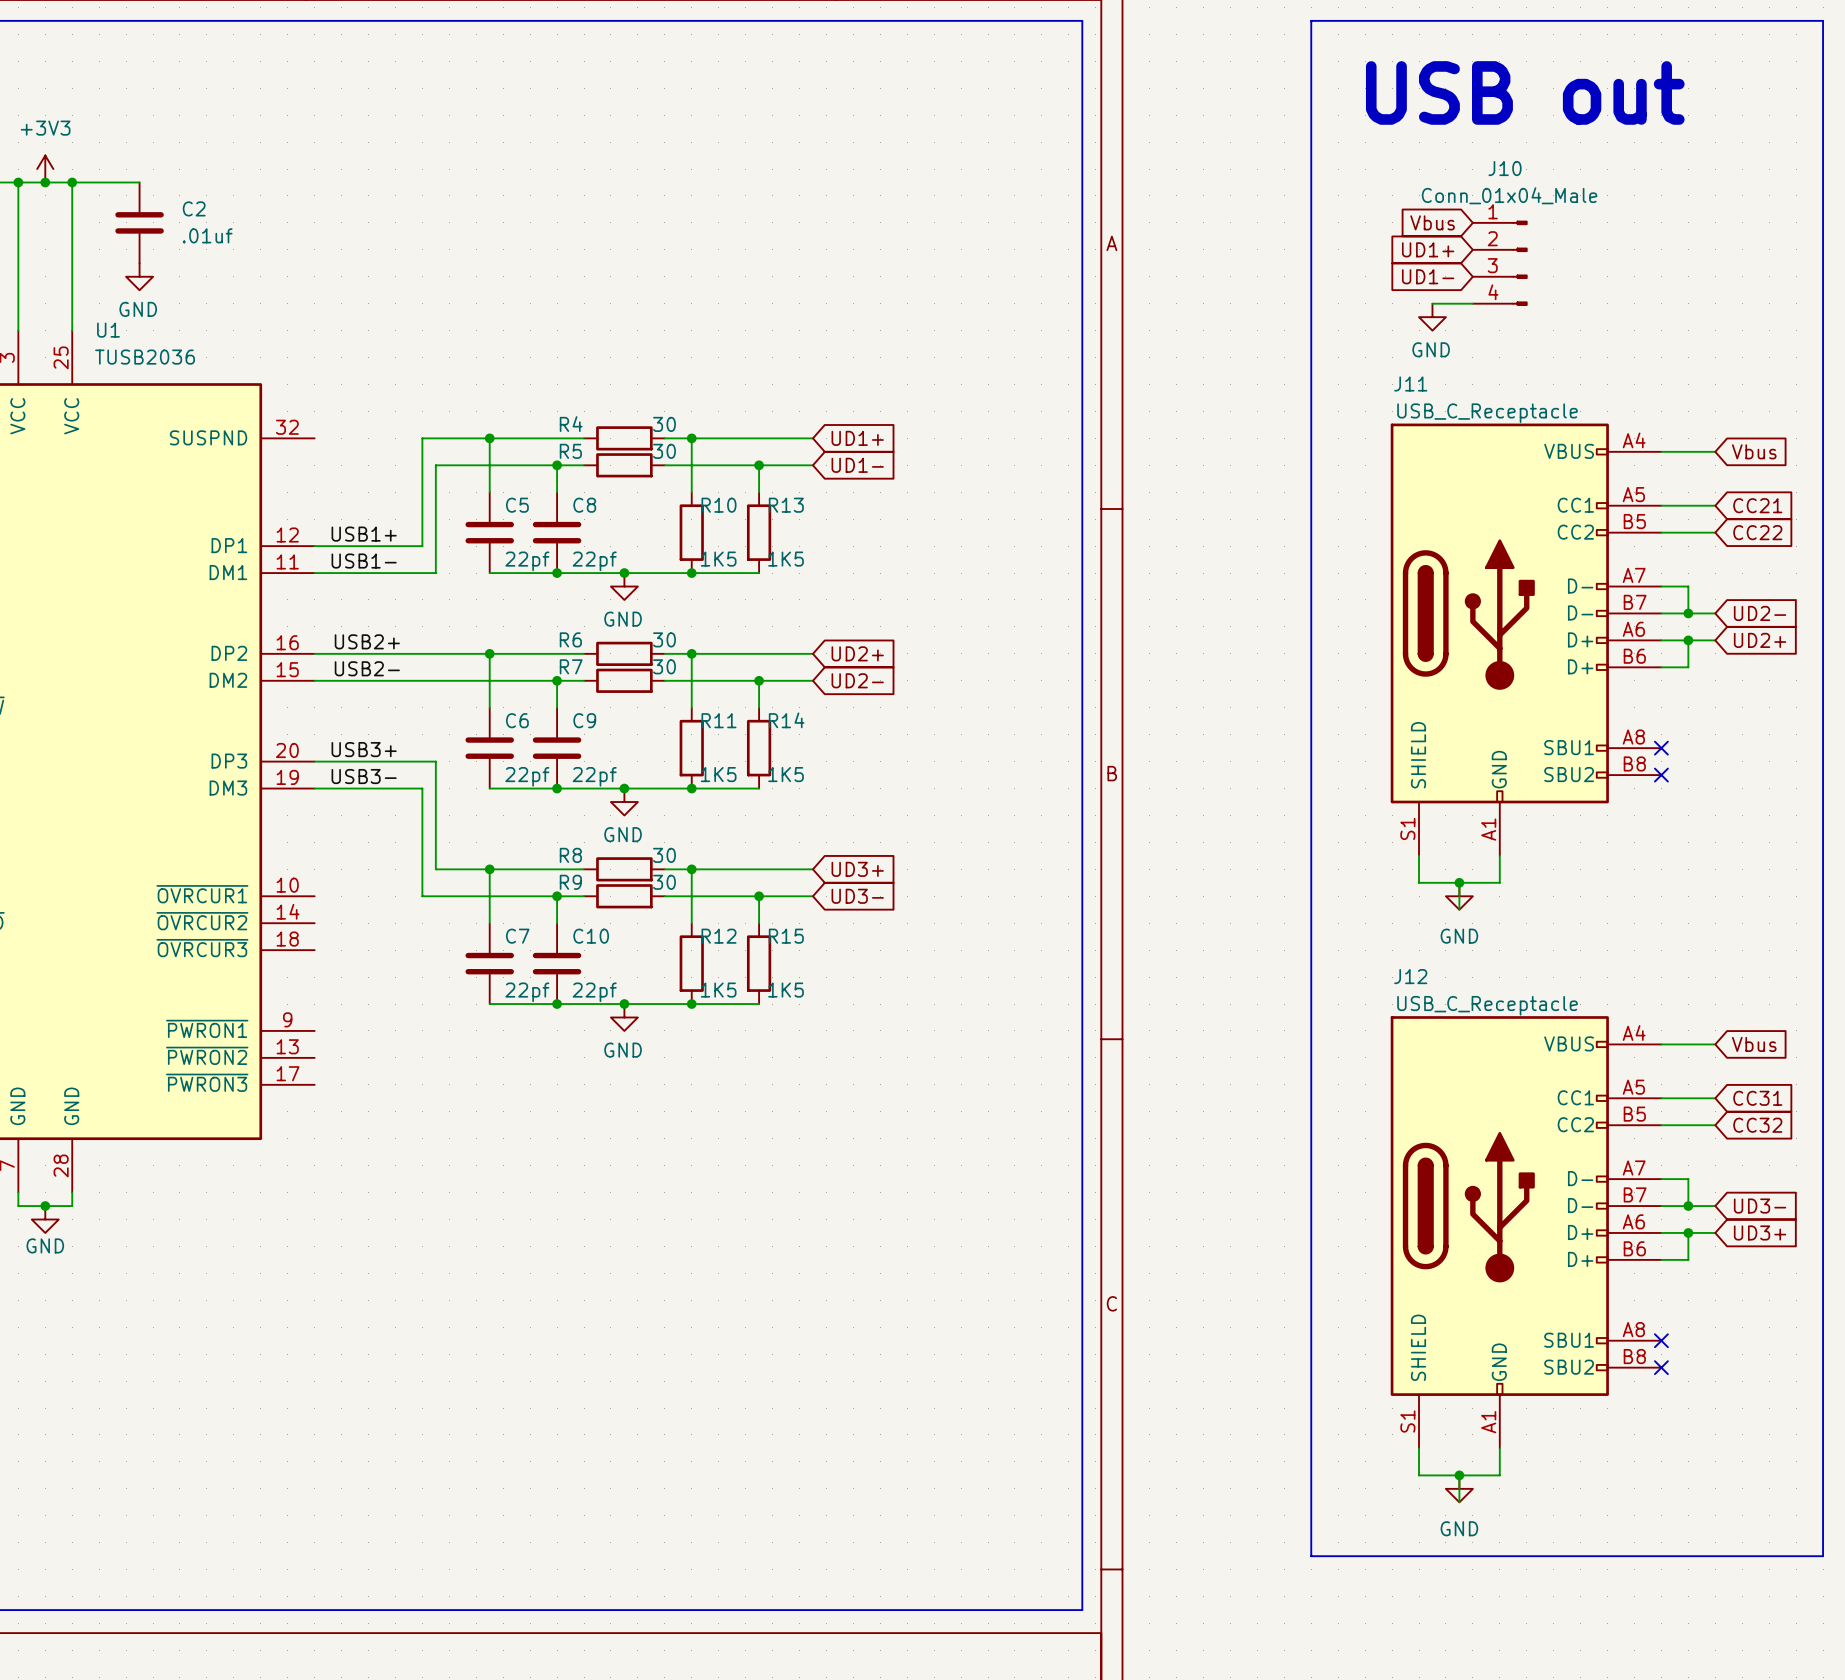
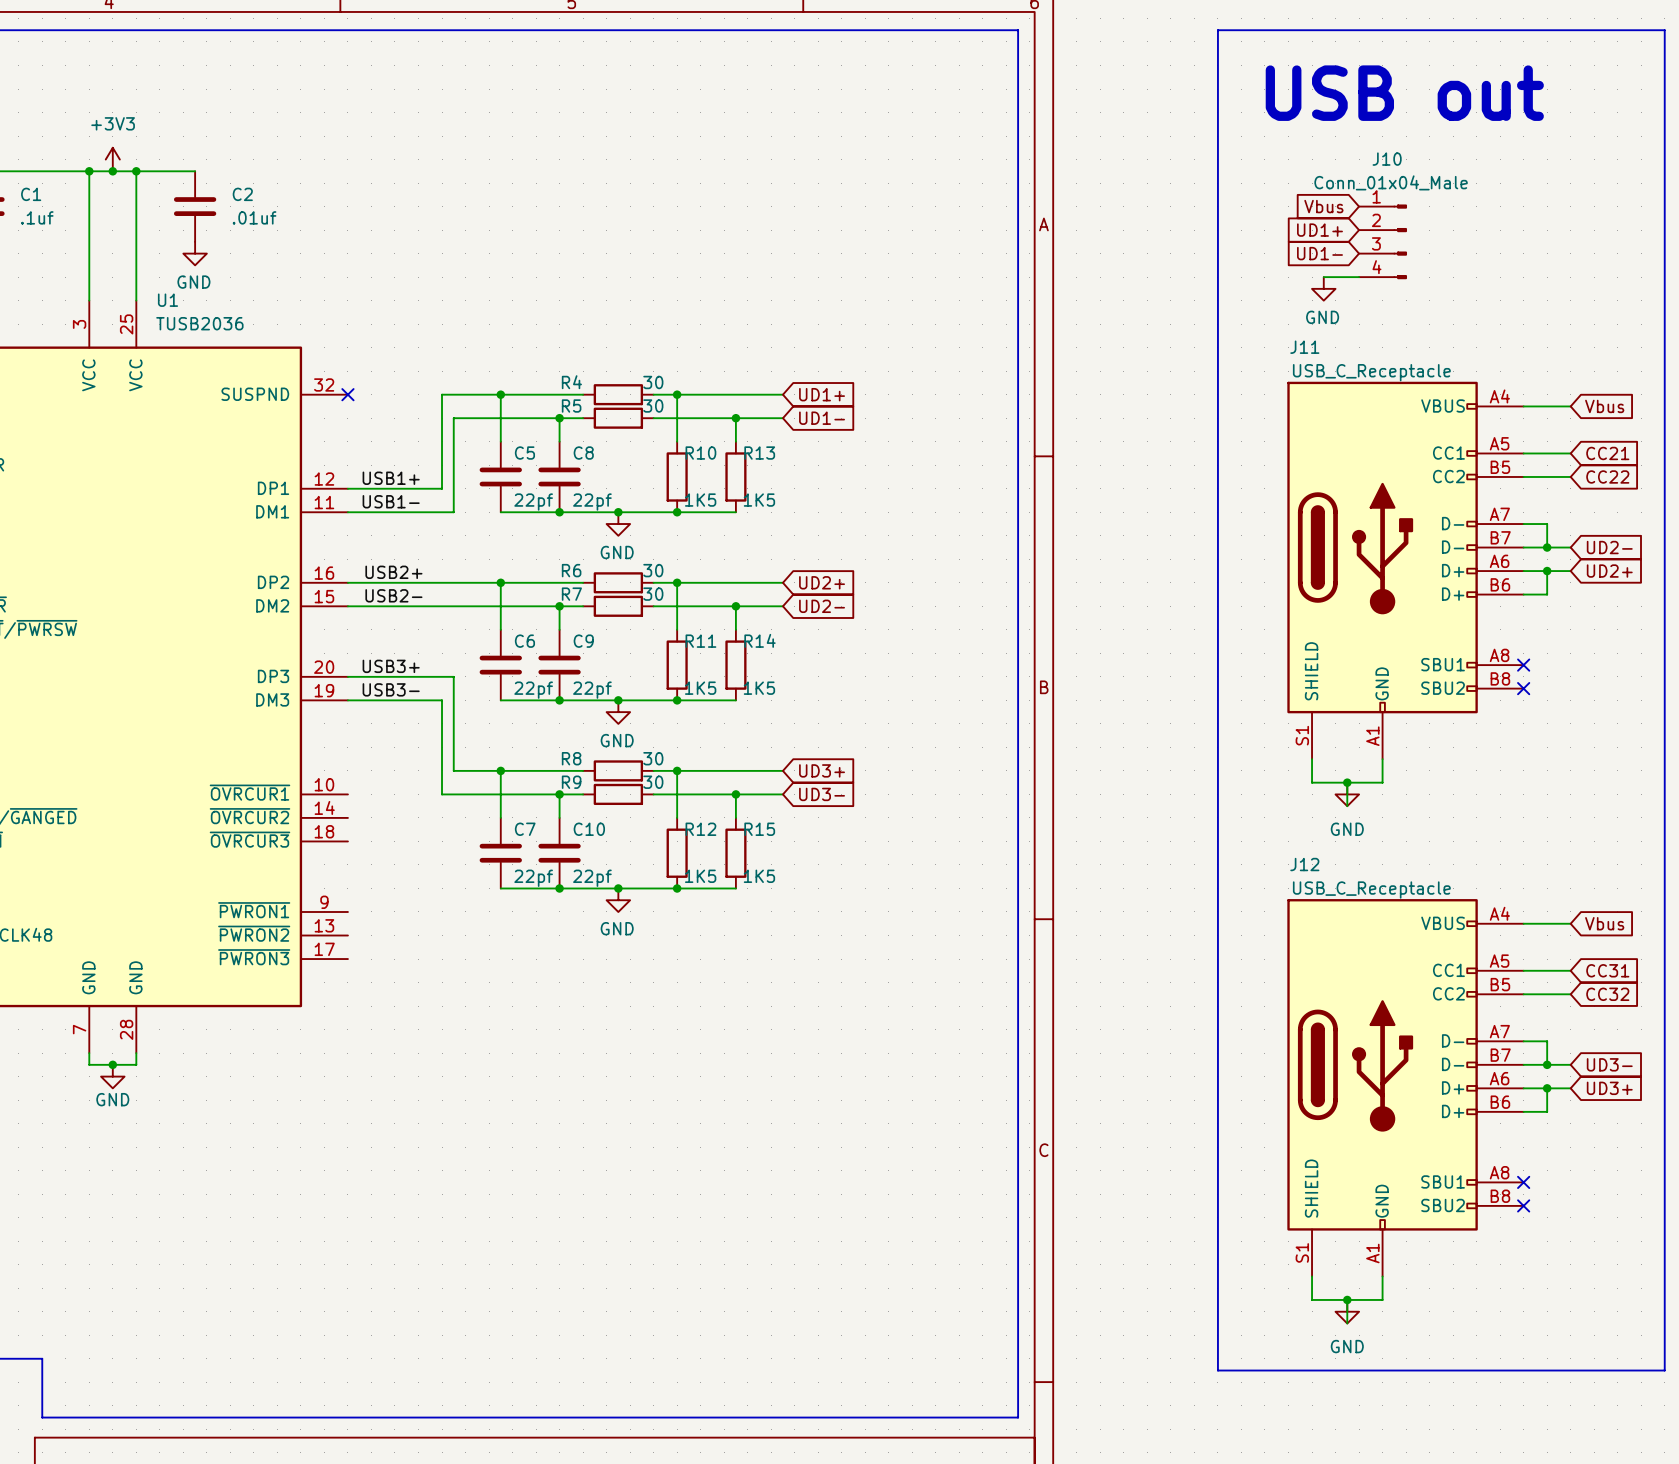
no-connect mark: none -> (347, 394)

